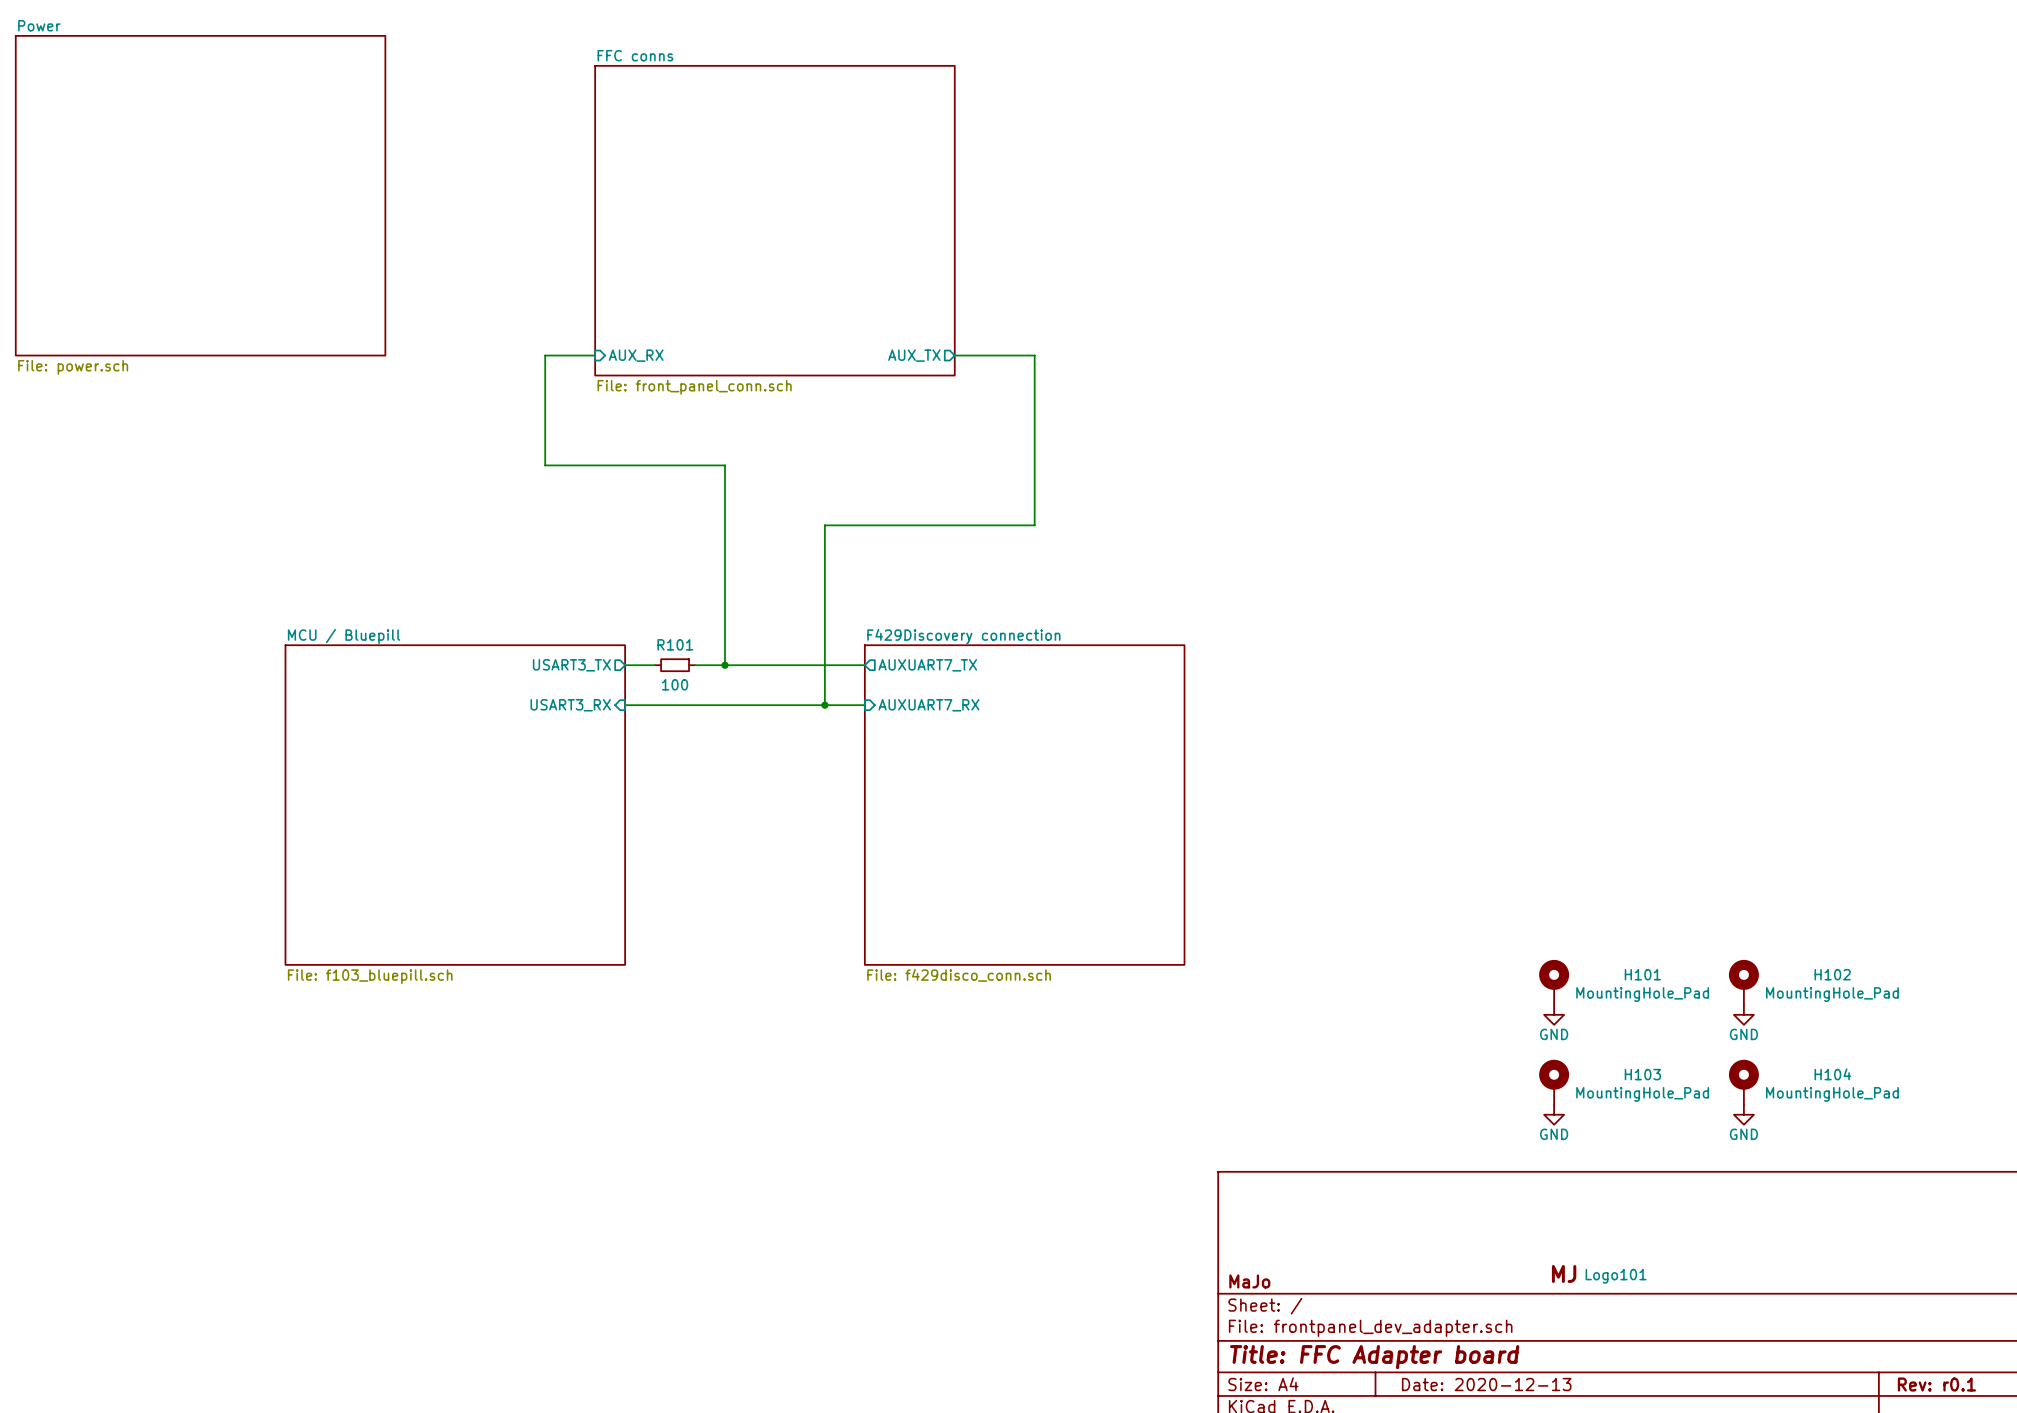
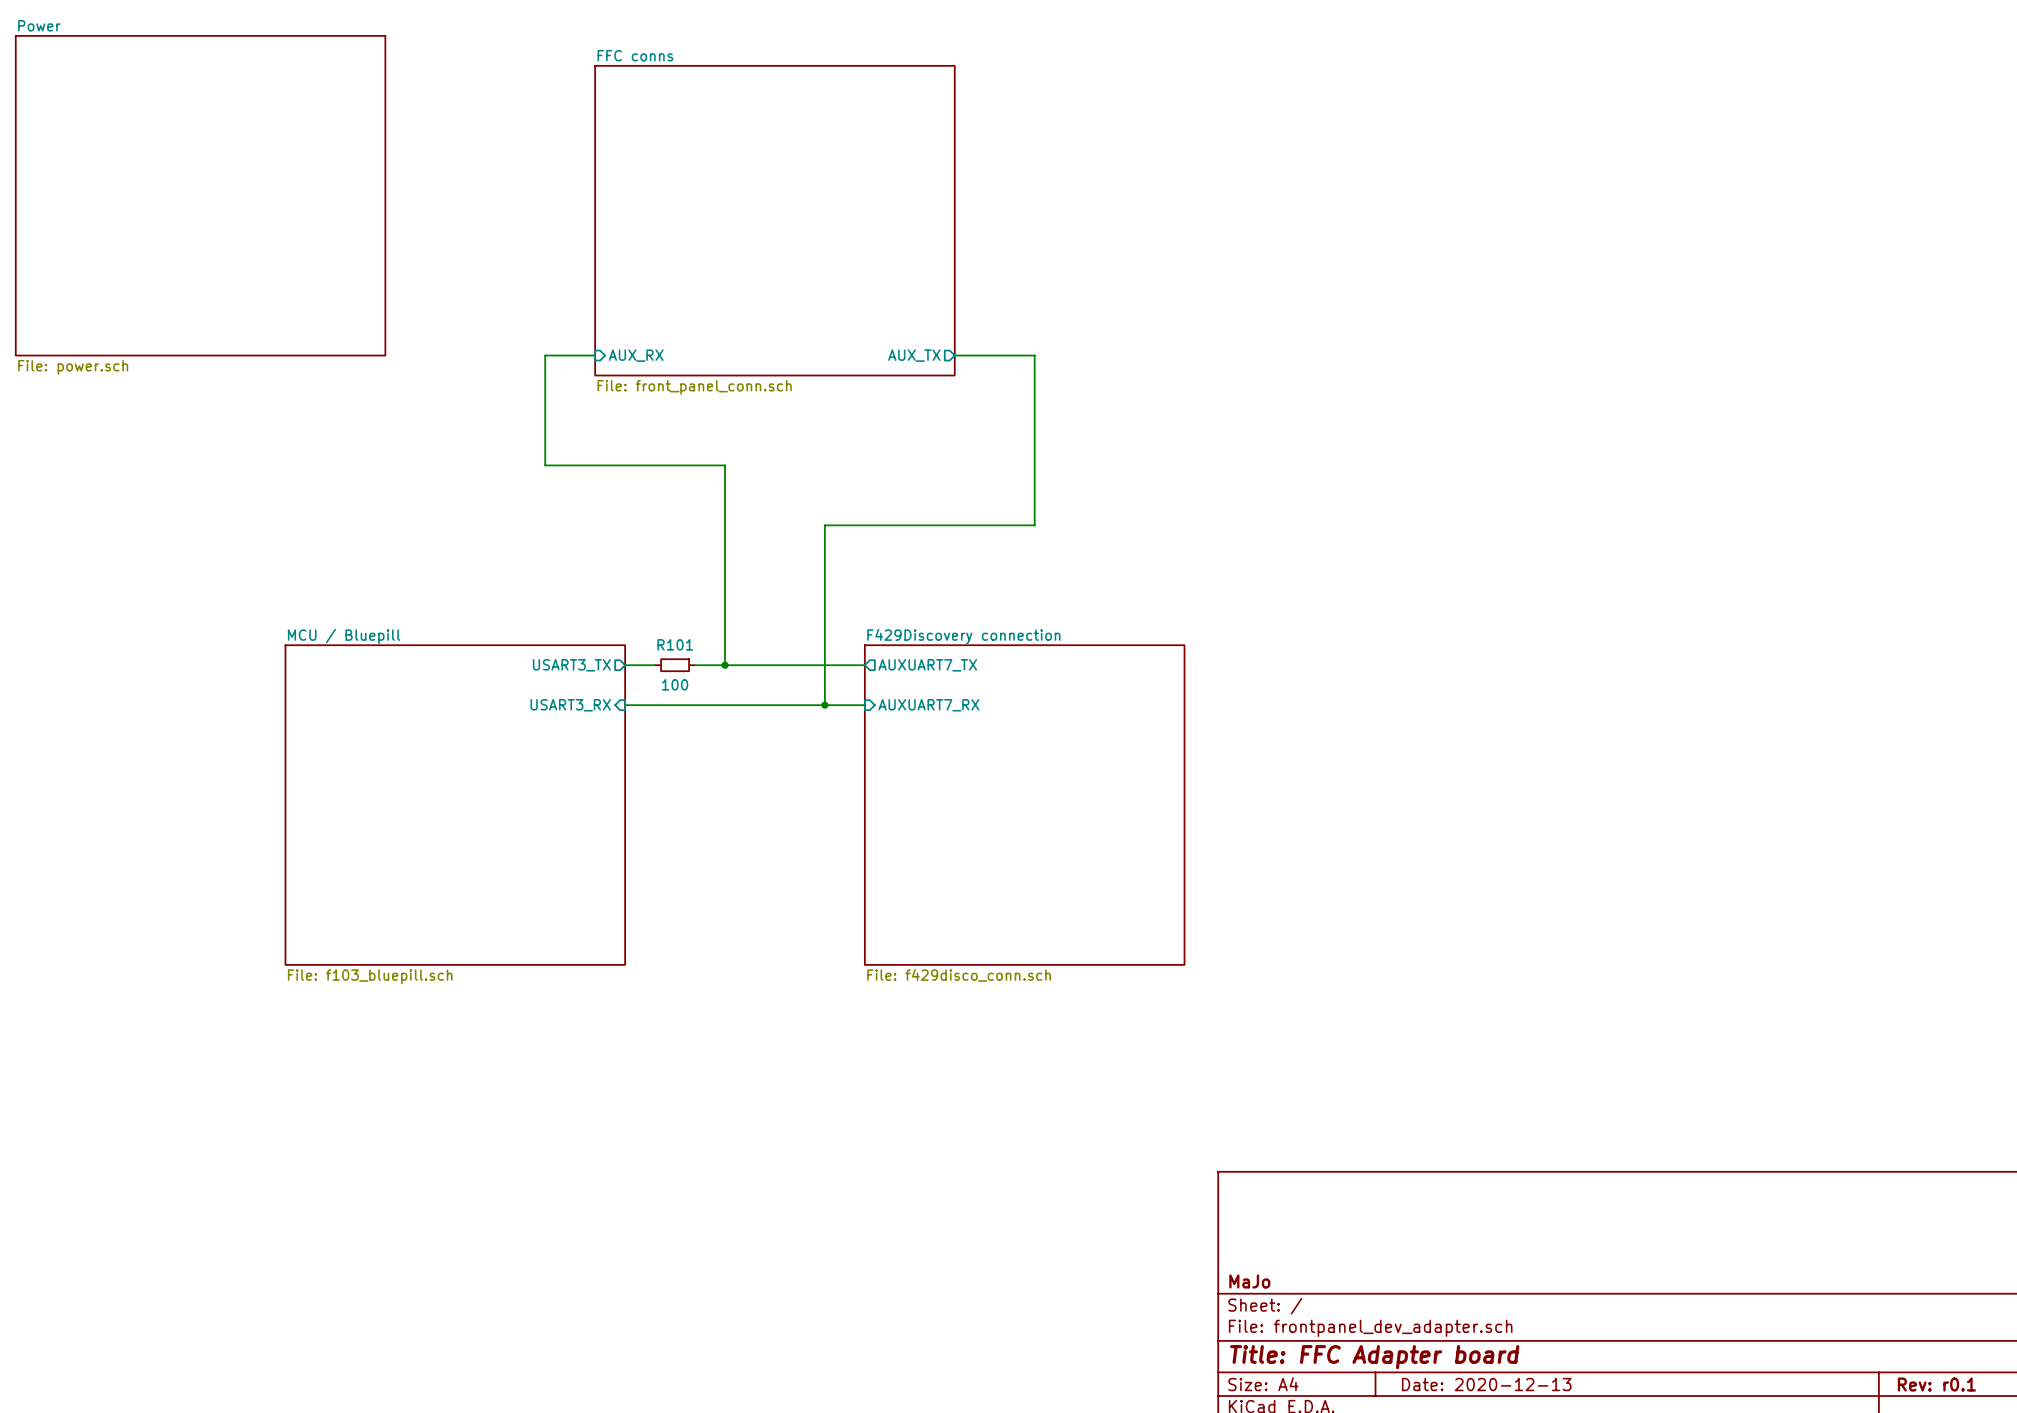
H101: MountingHole_Pad (1554, 982) -> none
H102: MountingHole_Pad (1743, 982) -> none
power symbol: GND (1554, 1014) -> none
power symbol: GND (1743, 1014) -> none
H103: MountingHole_Pad (1554, 1082) -> none
H104: MountingHole_Pad (1743, 1082) -> none
power symbol: GND (1554, 1114) -> none
power symbol: GND (1743, 1114) -> none
Logo101: (1599, 1274) -> none

